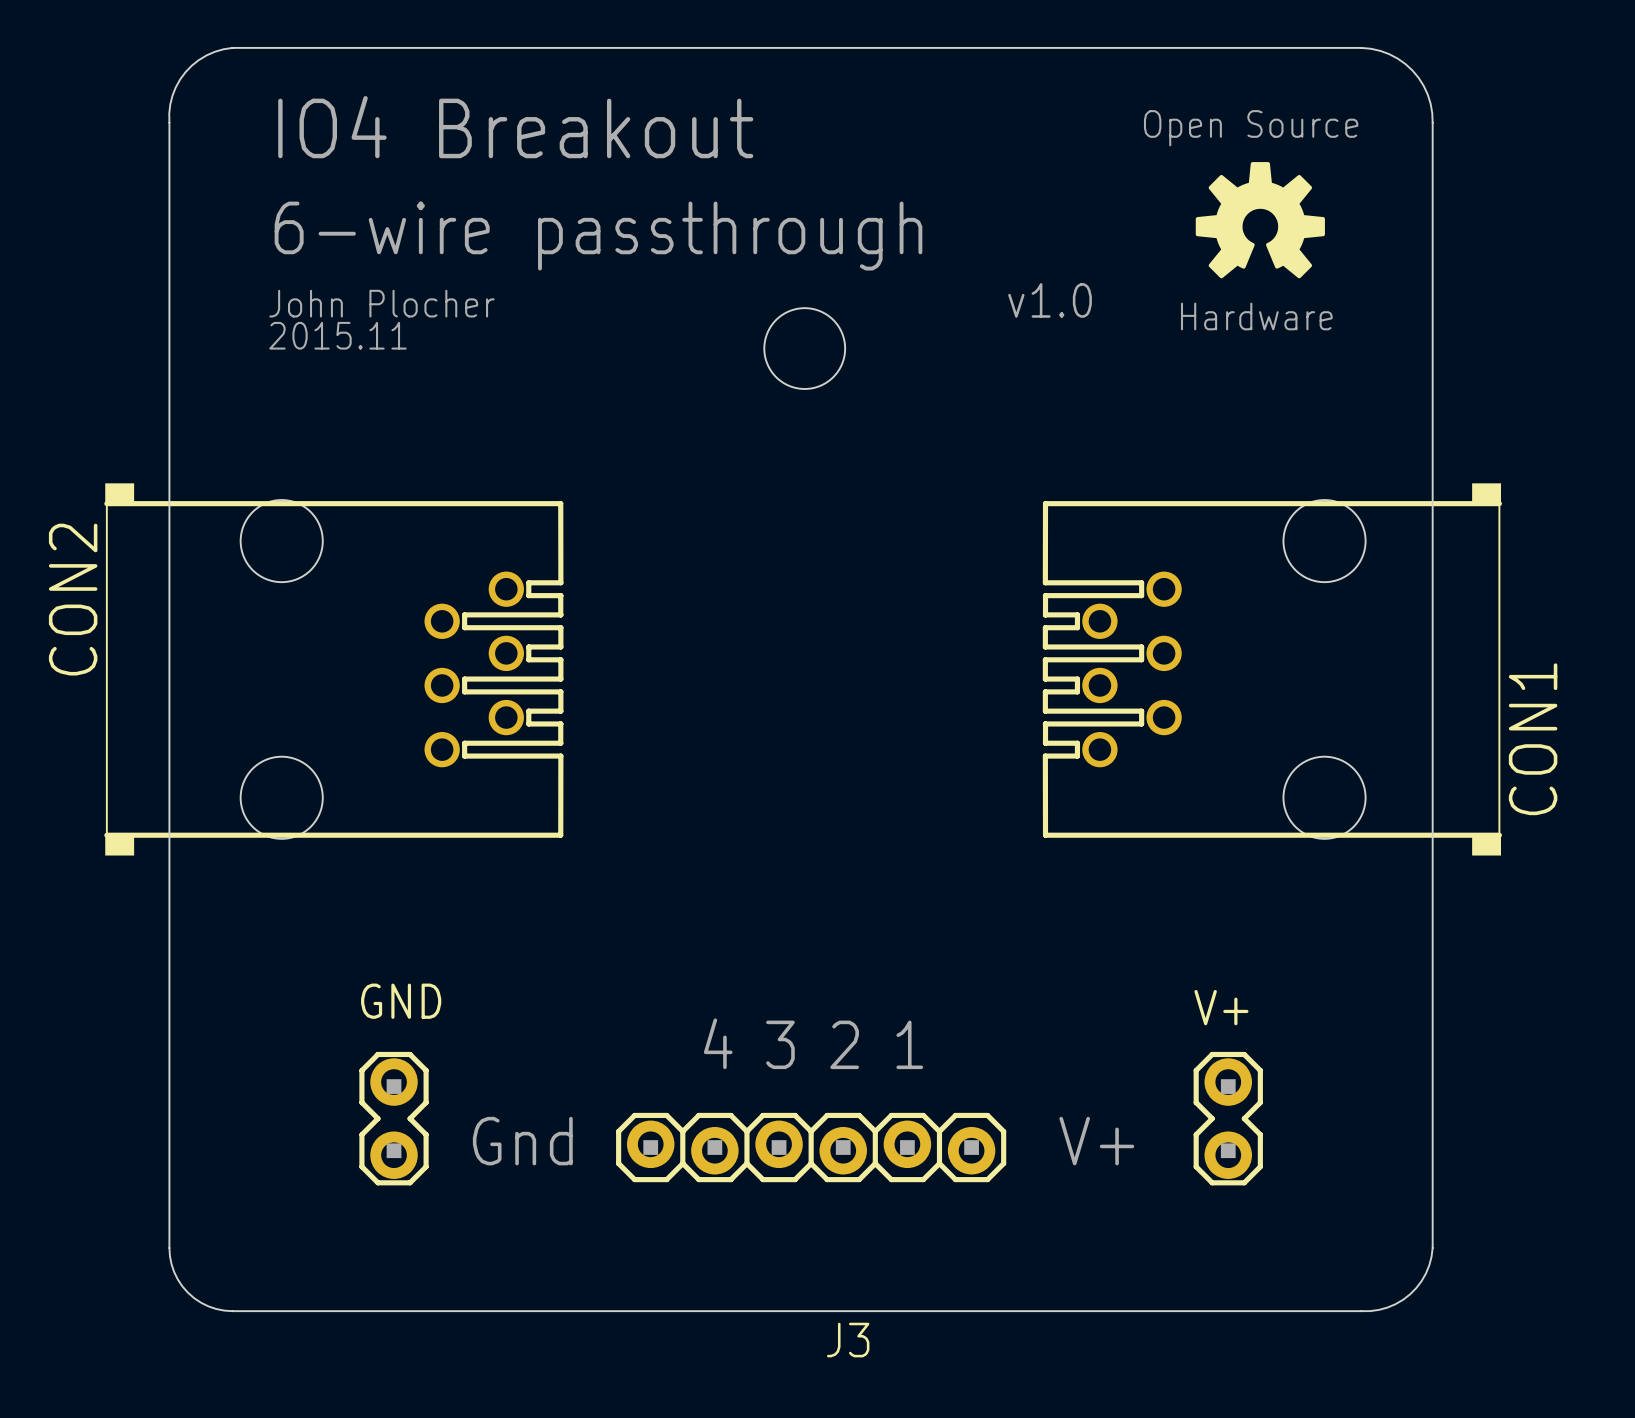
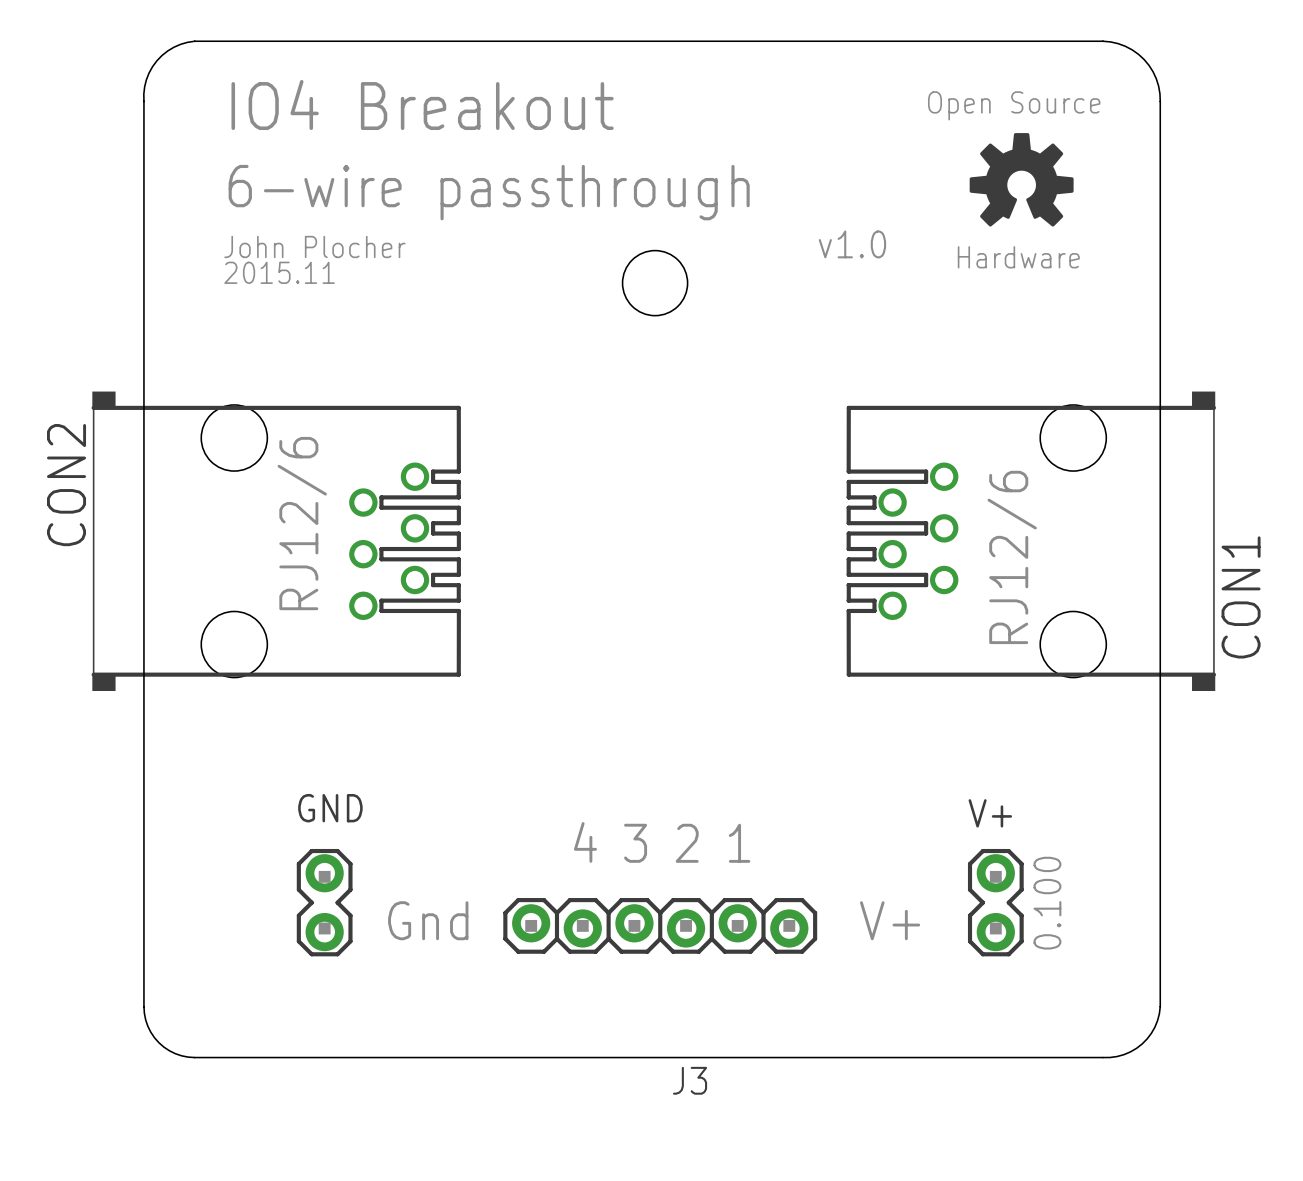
CON2 value: none -> RJ12/6 (302, 523)
CON1 value: none -> RJ12/6 (1012, 557)
V+ value: none -> 0.100 (1047, 903)

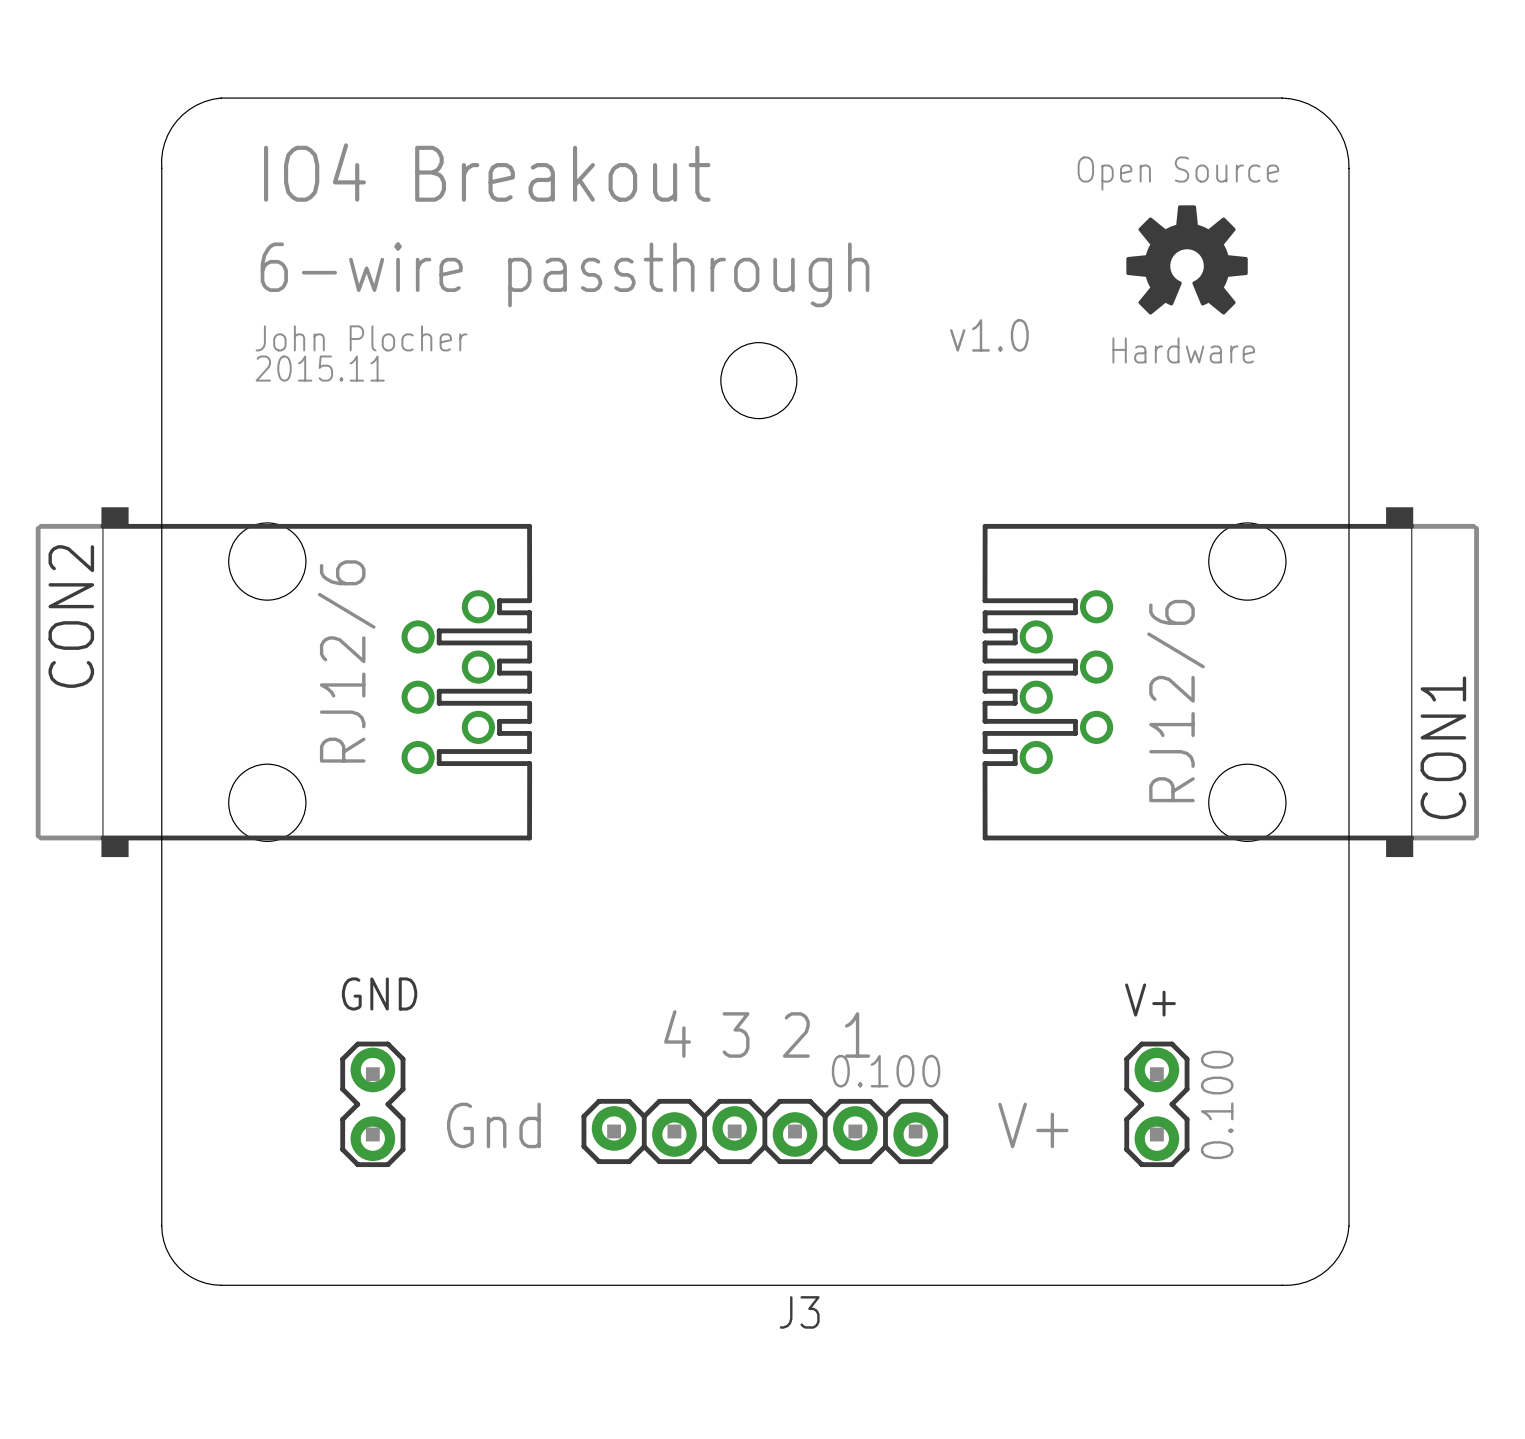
CON2 footprint: [91, 391, 461, 691] -> [35, 507, 533, 858]
CON1 footprint: [846, 391, 1217, 691] -> [982, 507, 1479, 858]
J3 value: none -> 0.100 (886, 1071)

